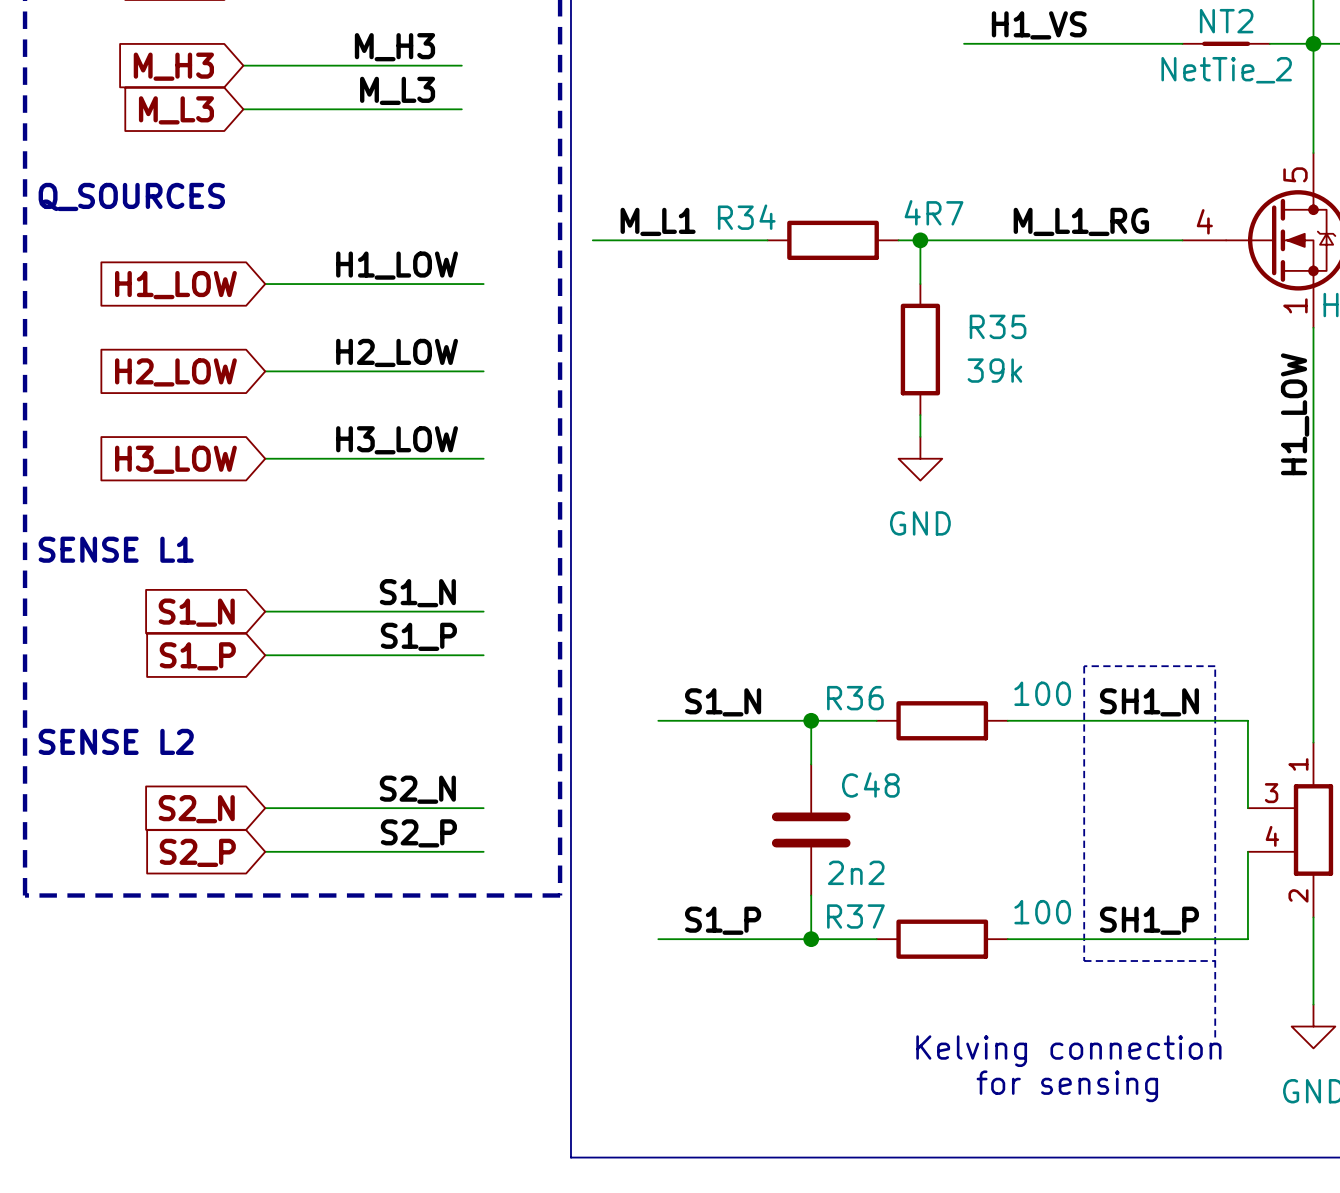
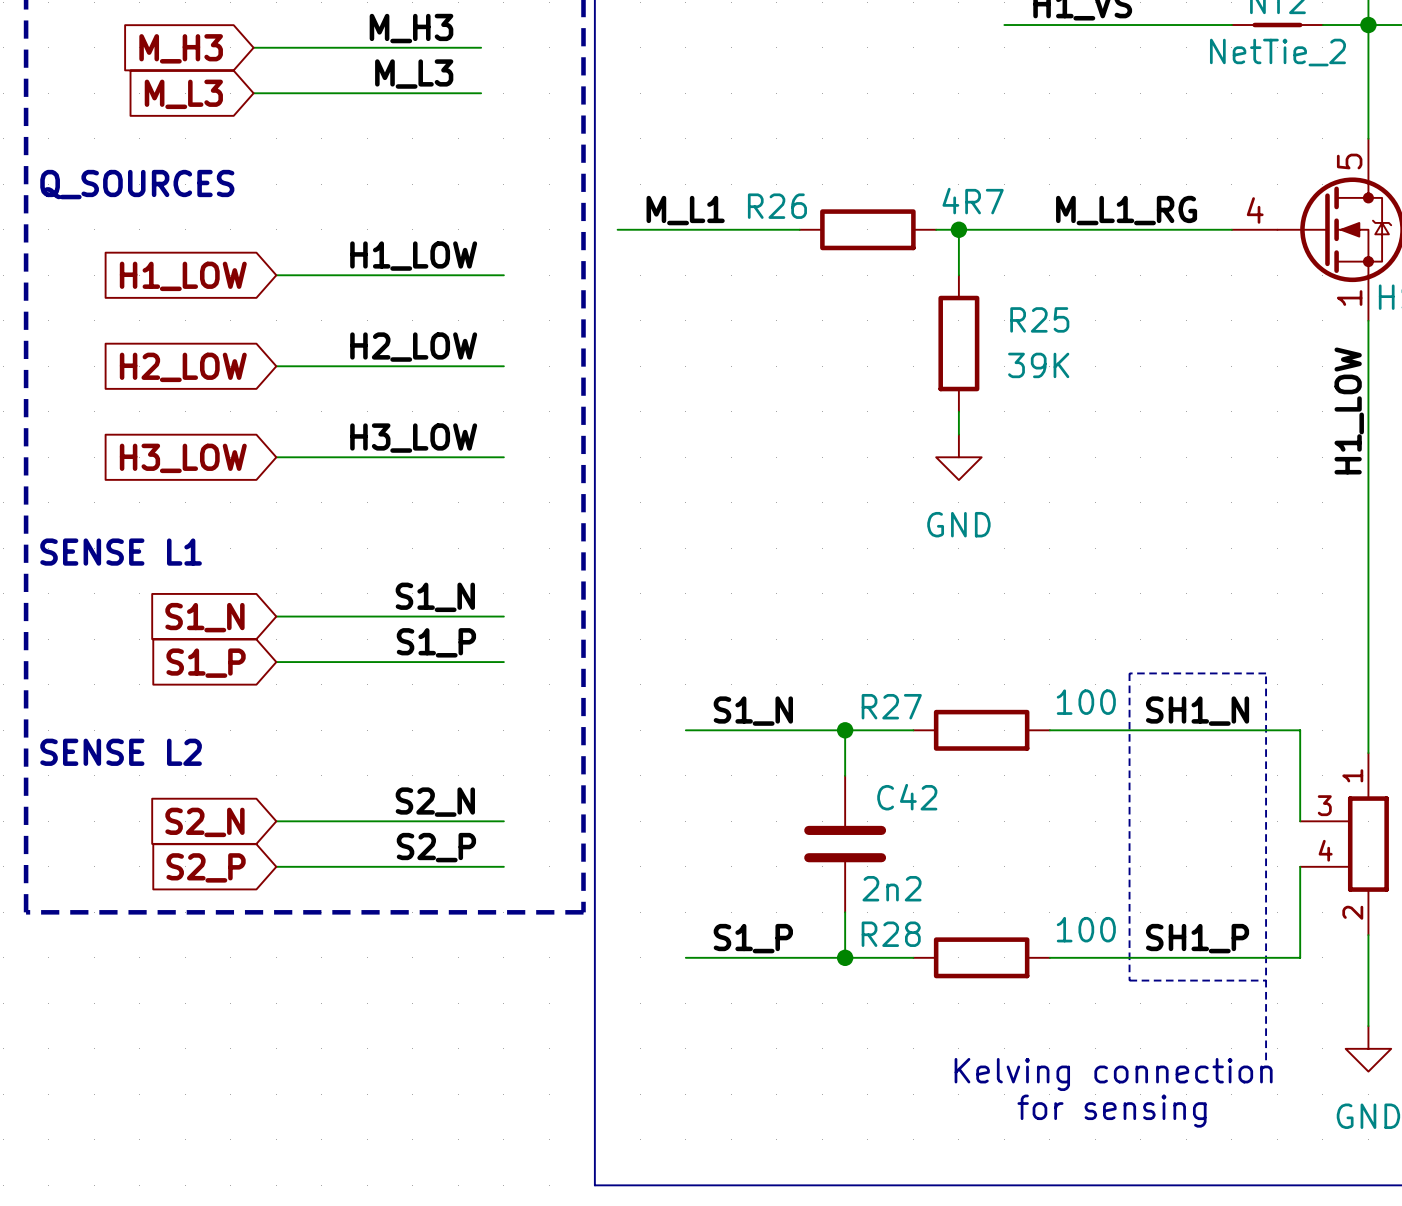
R34 name: R34 (746, 217) -> R26 (777, 206)
R35 name: R35 (998, 326) -> R25 (1039, 319)
R35 value: 39k (994, 370) -> 39K (1038, 365)
R36 name: R36 (855, 698) -> R27 (891, 706)
C48 name: C48 (870, 784) -> C42 (907, 797)
R37 name: R37 (855, 916) -> R28 (891, 934)

